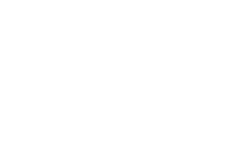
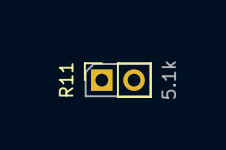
R11: none -> 5.1k (117, 80)

